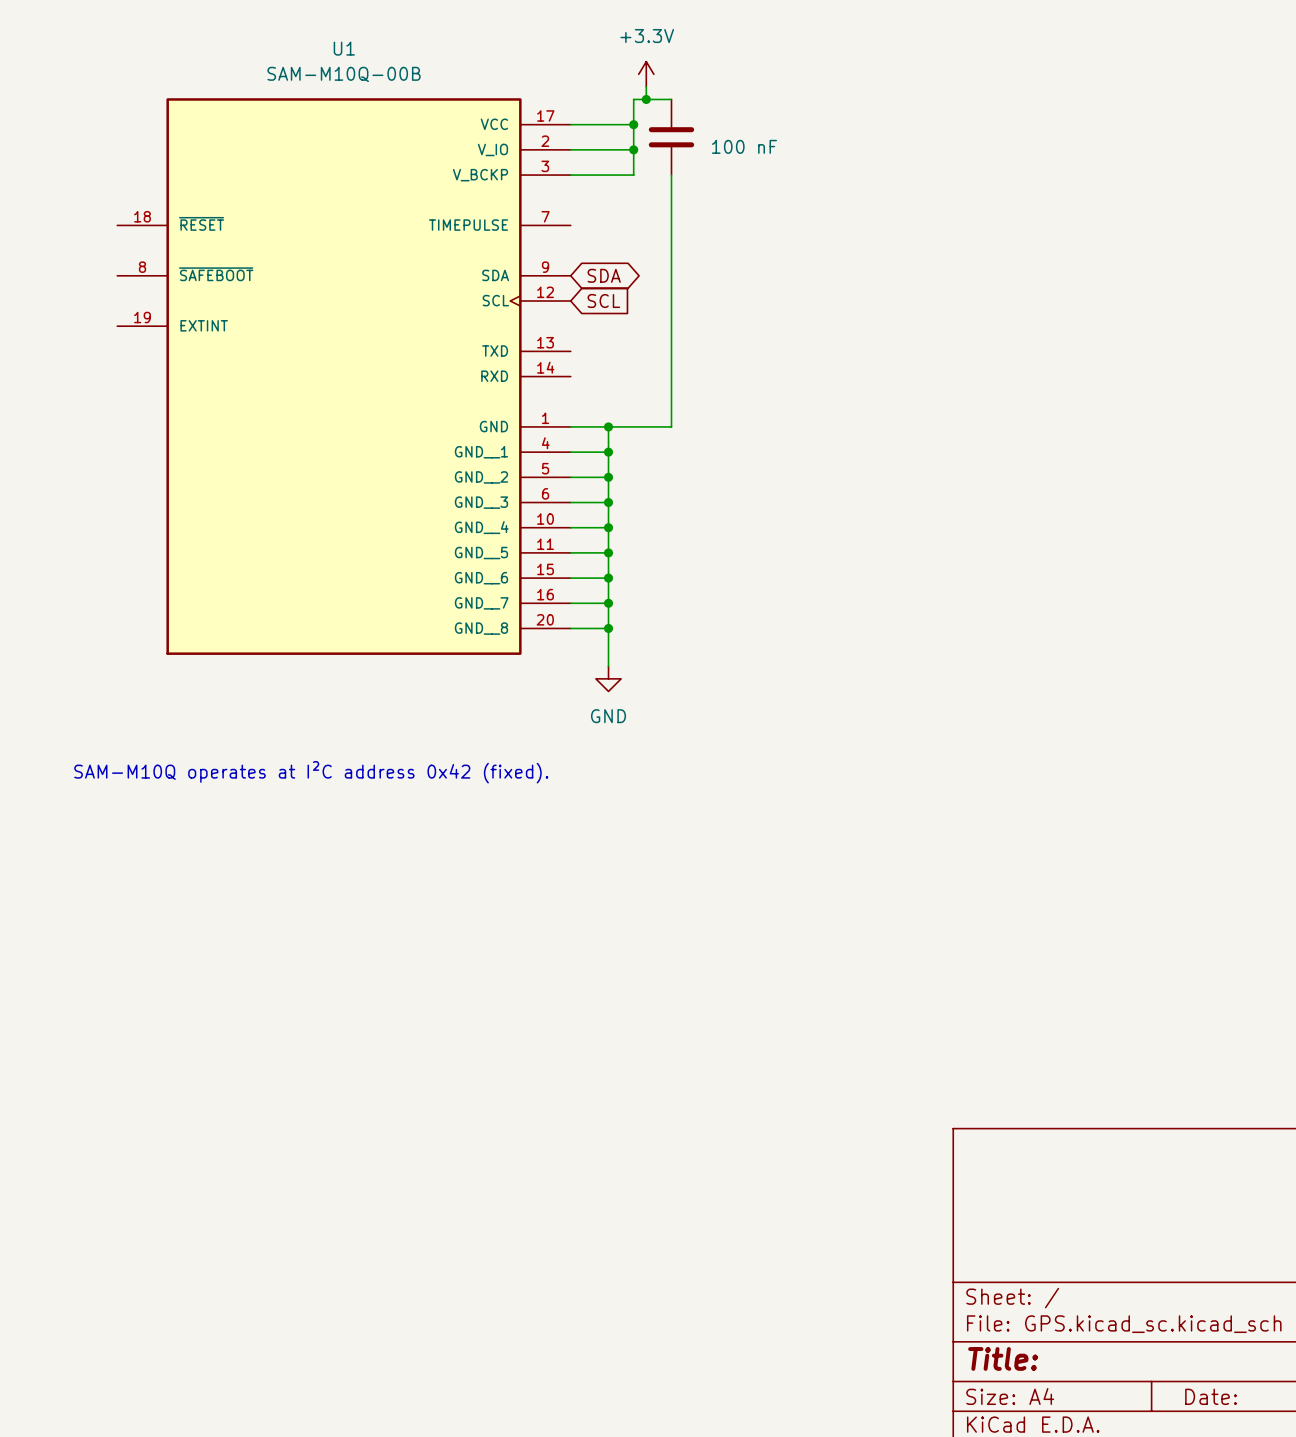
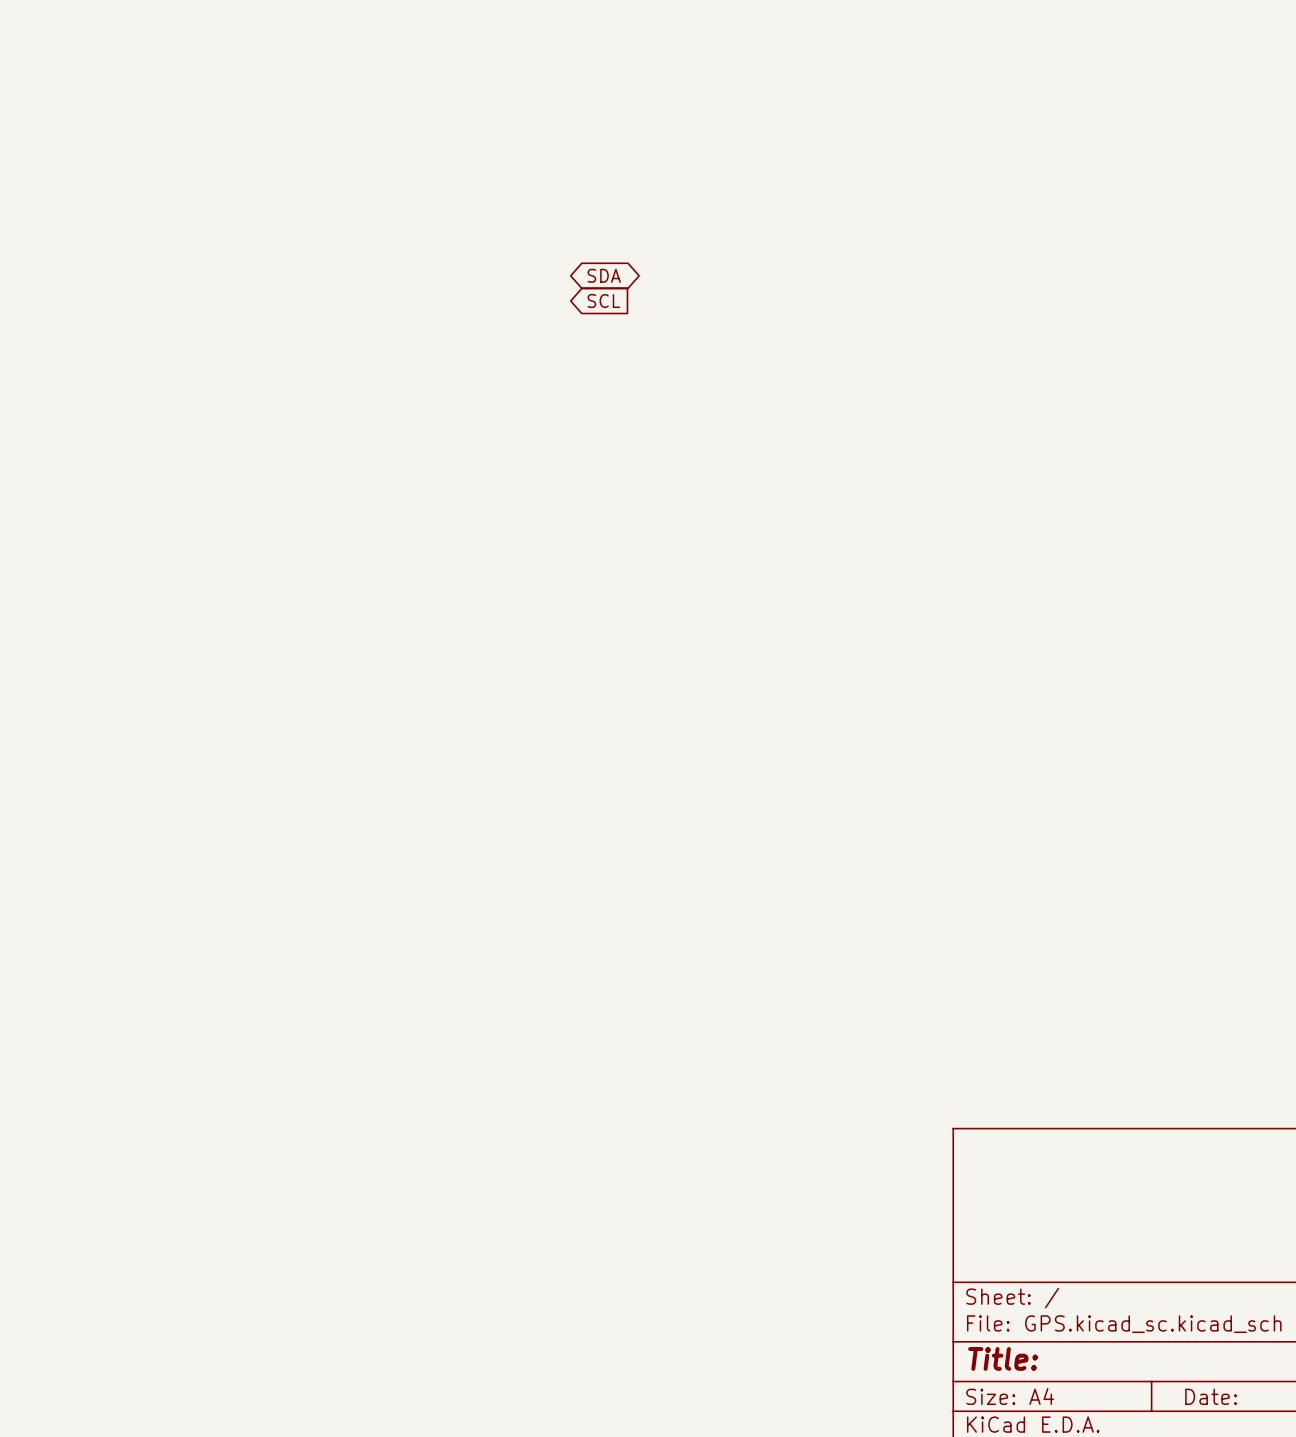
power symbol: +3.3V (646, 74) -> none
wire: (646, 86) (646, 99) -> none
junction: (646, 99) -> none
wire: (671, 99) (633, 99) (633, 175) (570, 175) -> none
wire: (570, 124) (633, 124) -> none
junction: (633, 124) -> none
part: 100 nF (671, 137) -> none
wire: (570, 149) (633, 149) -> none
junction: (633, 149) -> none
wire: (671, 175) (671, 426) (570, 426) -> none
U1: SAM-M10Q-00B (344, 376) -> none
wire: (608, 426) (608, 666) -> none
junction: (608, 426) -> none
wire: (570, 452) (608, 452) -> none
junction: (608, 452) -> none
wire: (570, 477) (608, 477) -> none
junction: (608, 477) -> none
wire: (570, 502) (608, 502) -> none
junction: (608, 502) -> none
wire: (570, 527) (608, 527) -> none
junction: (608, 527) -> none
wire: (570, 552) (608, 552) -> none
junction: (608, 552) -> none
wire: (570, 578) (608, 578) -> none
junction: (608, 578) -> none
wire: (570, 603) (608, 603) -> none
junction: (608, 603) -> none
wire: (570, 628) (608, 628) -> none
junction: (608, 628) -> none
power symbol: GND (608, 678) -> none
text: SAM-M10Q operates at I²C address 0x42 (fixed). (311, 772) -> none

